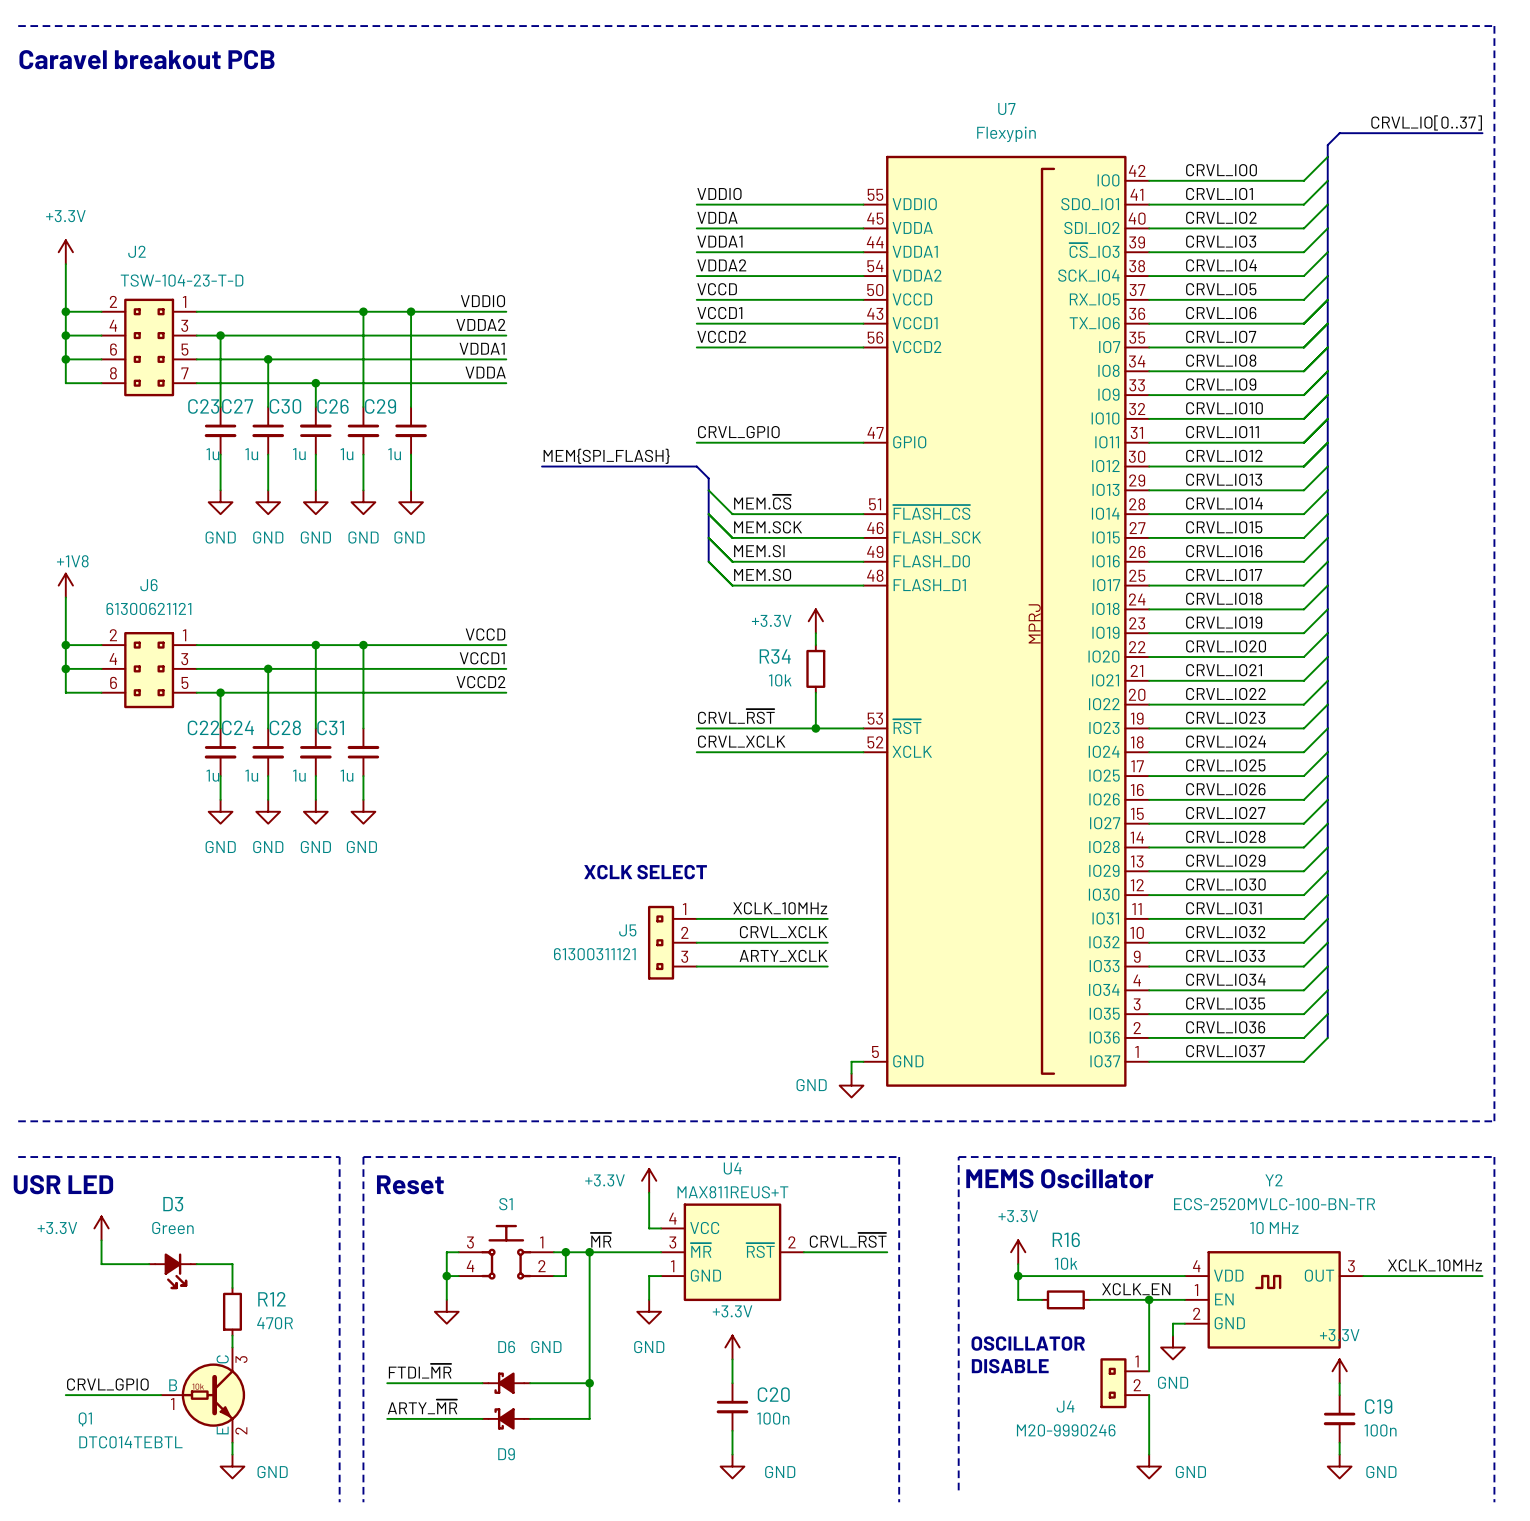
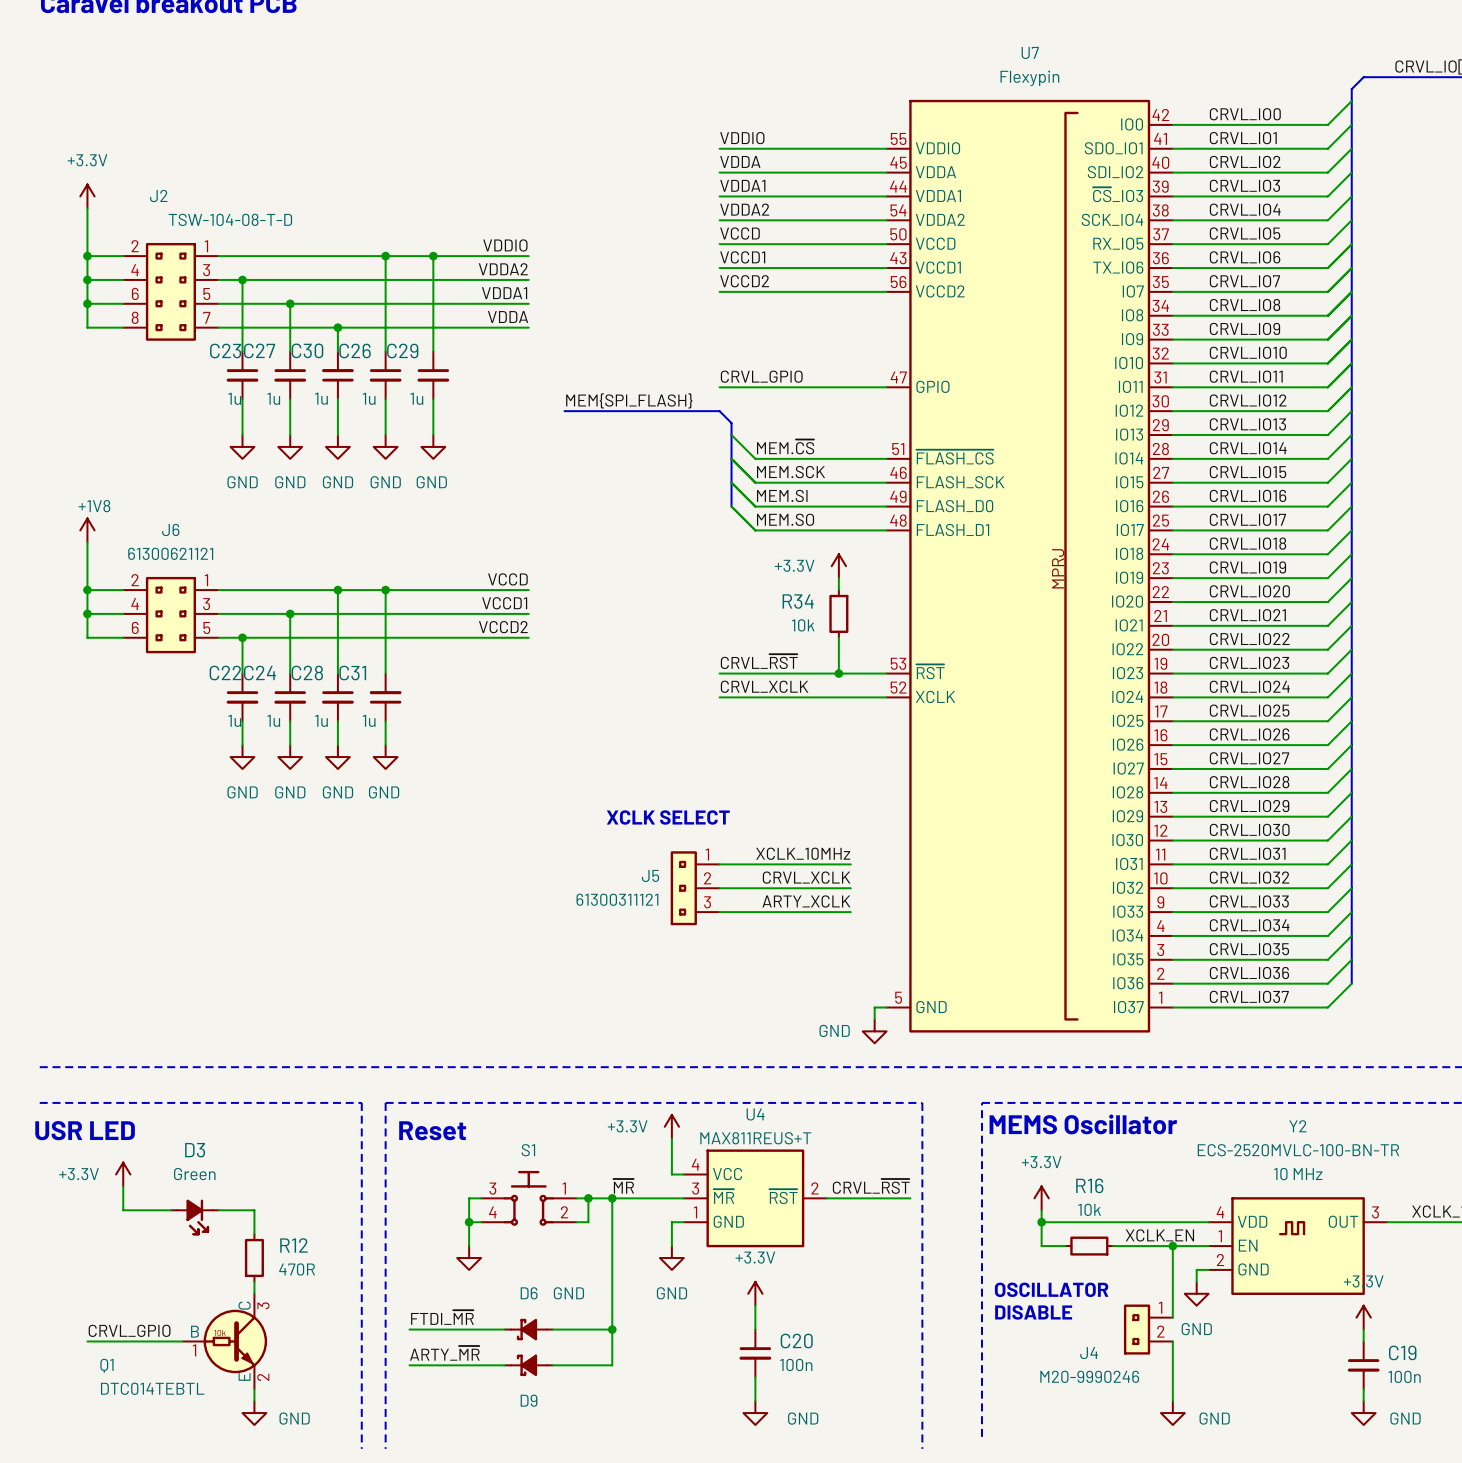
J2 text: TSW-104-23-T-D (182, 280) -> TSW-104-08-T-D (230, 219)

